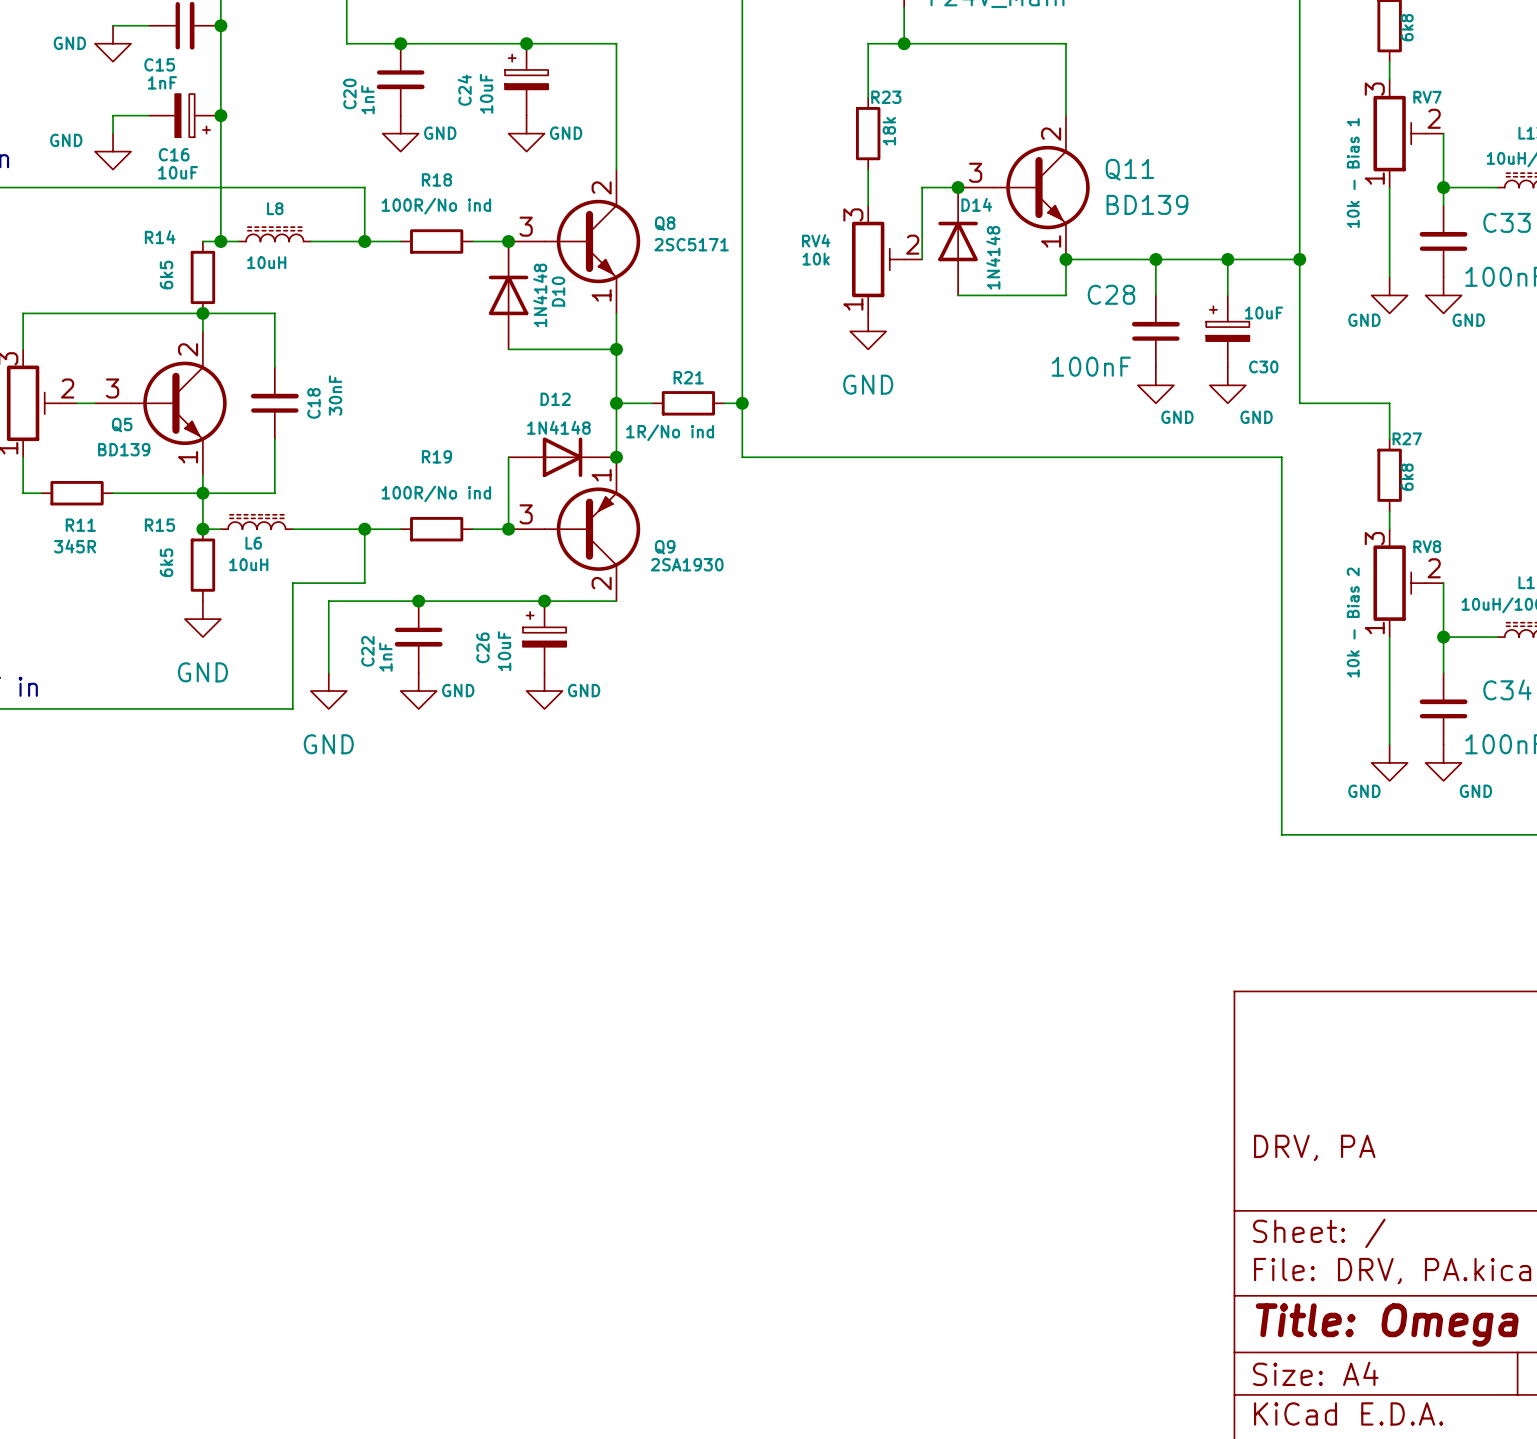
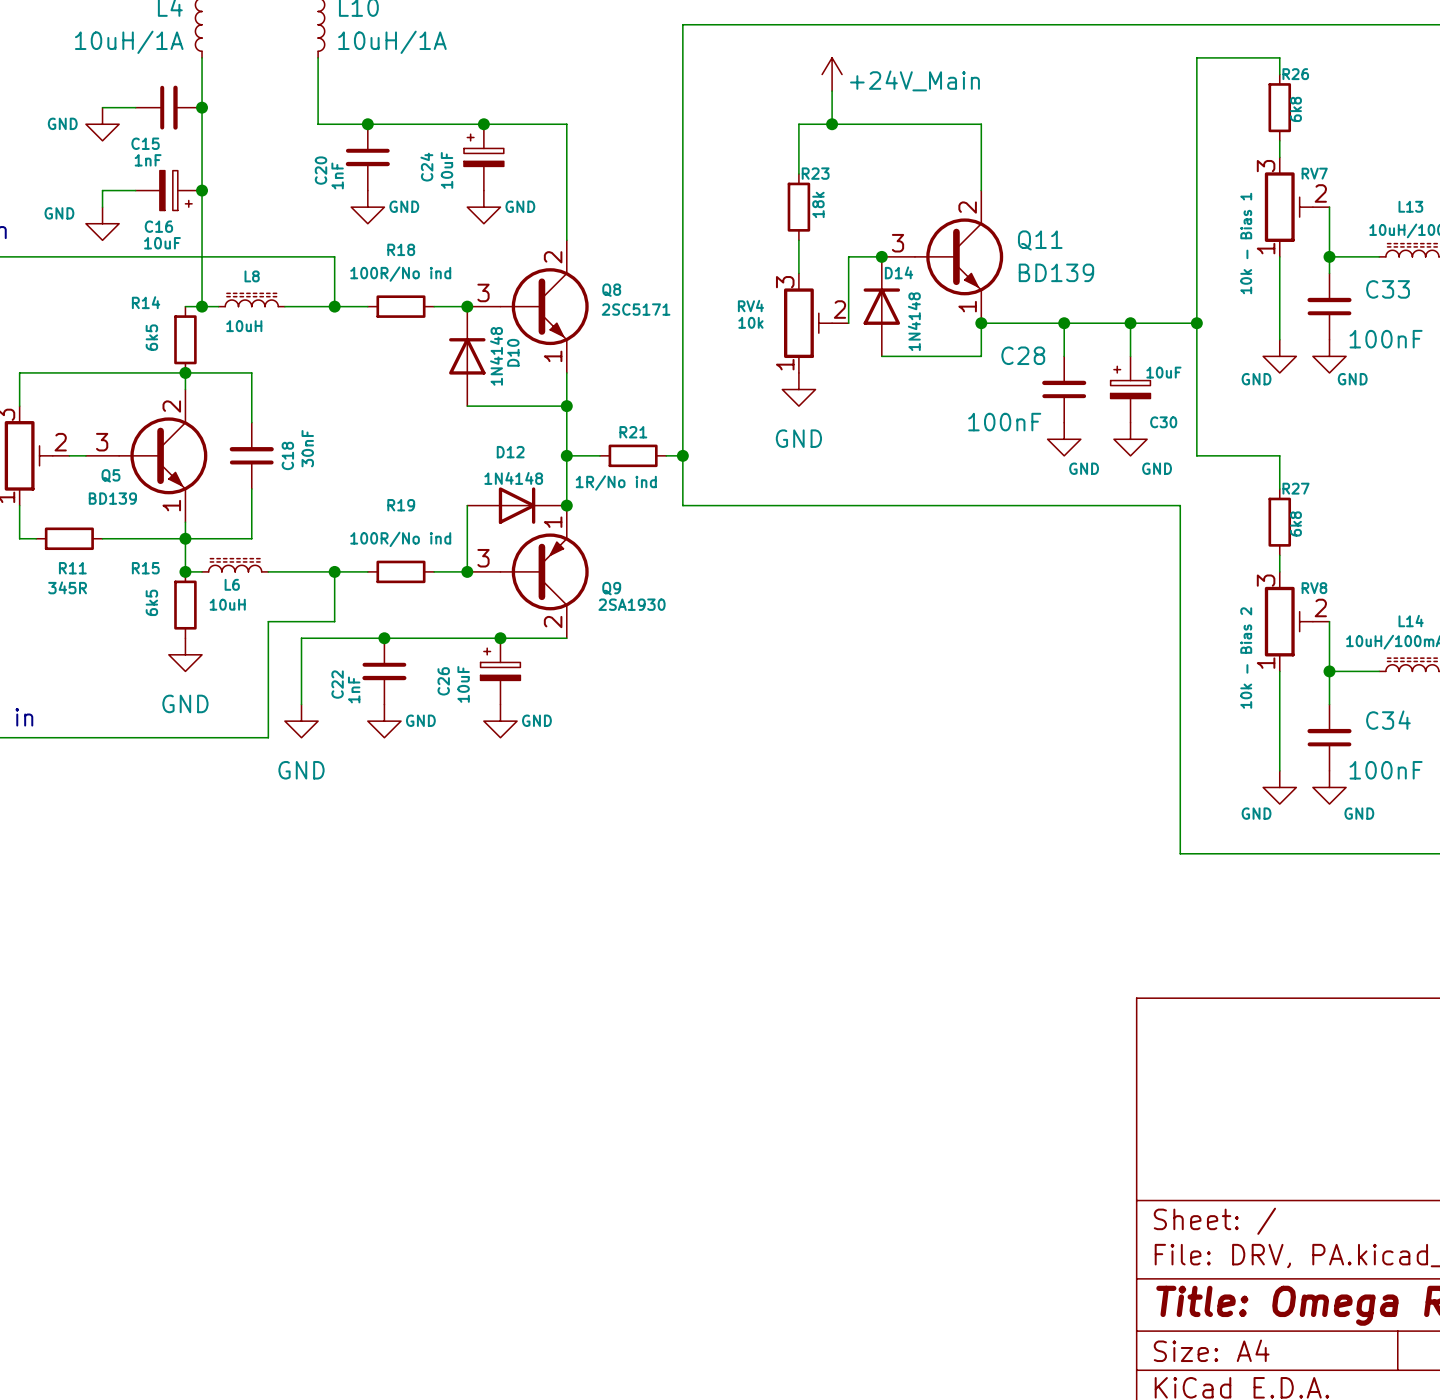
title block: DRV, PA (1314, 1147) -> none

